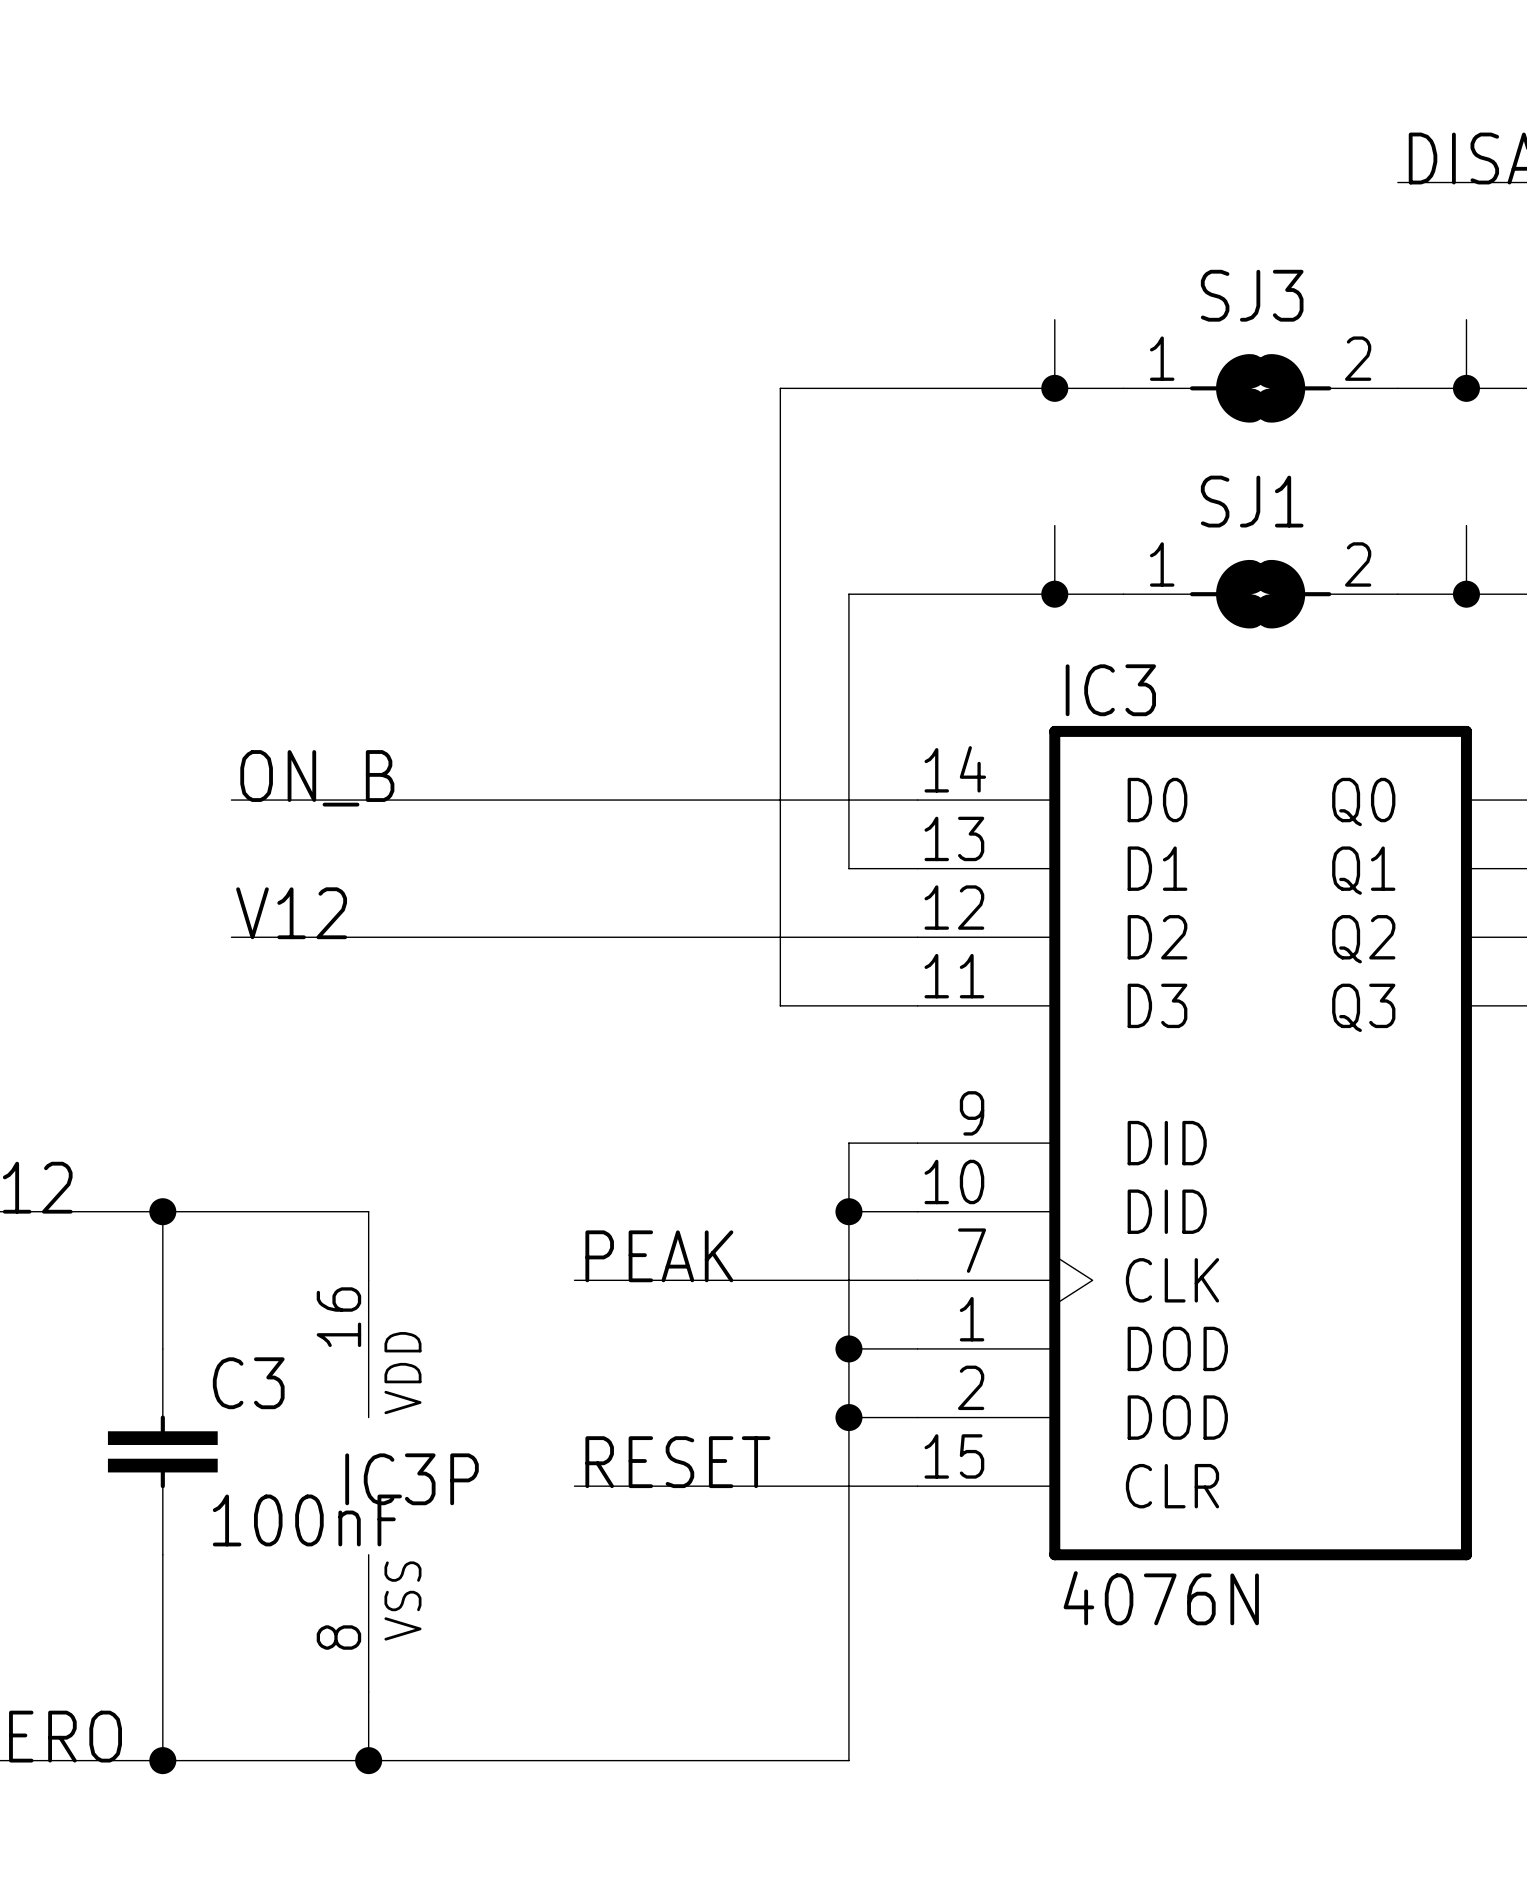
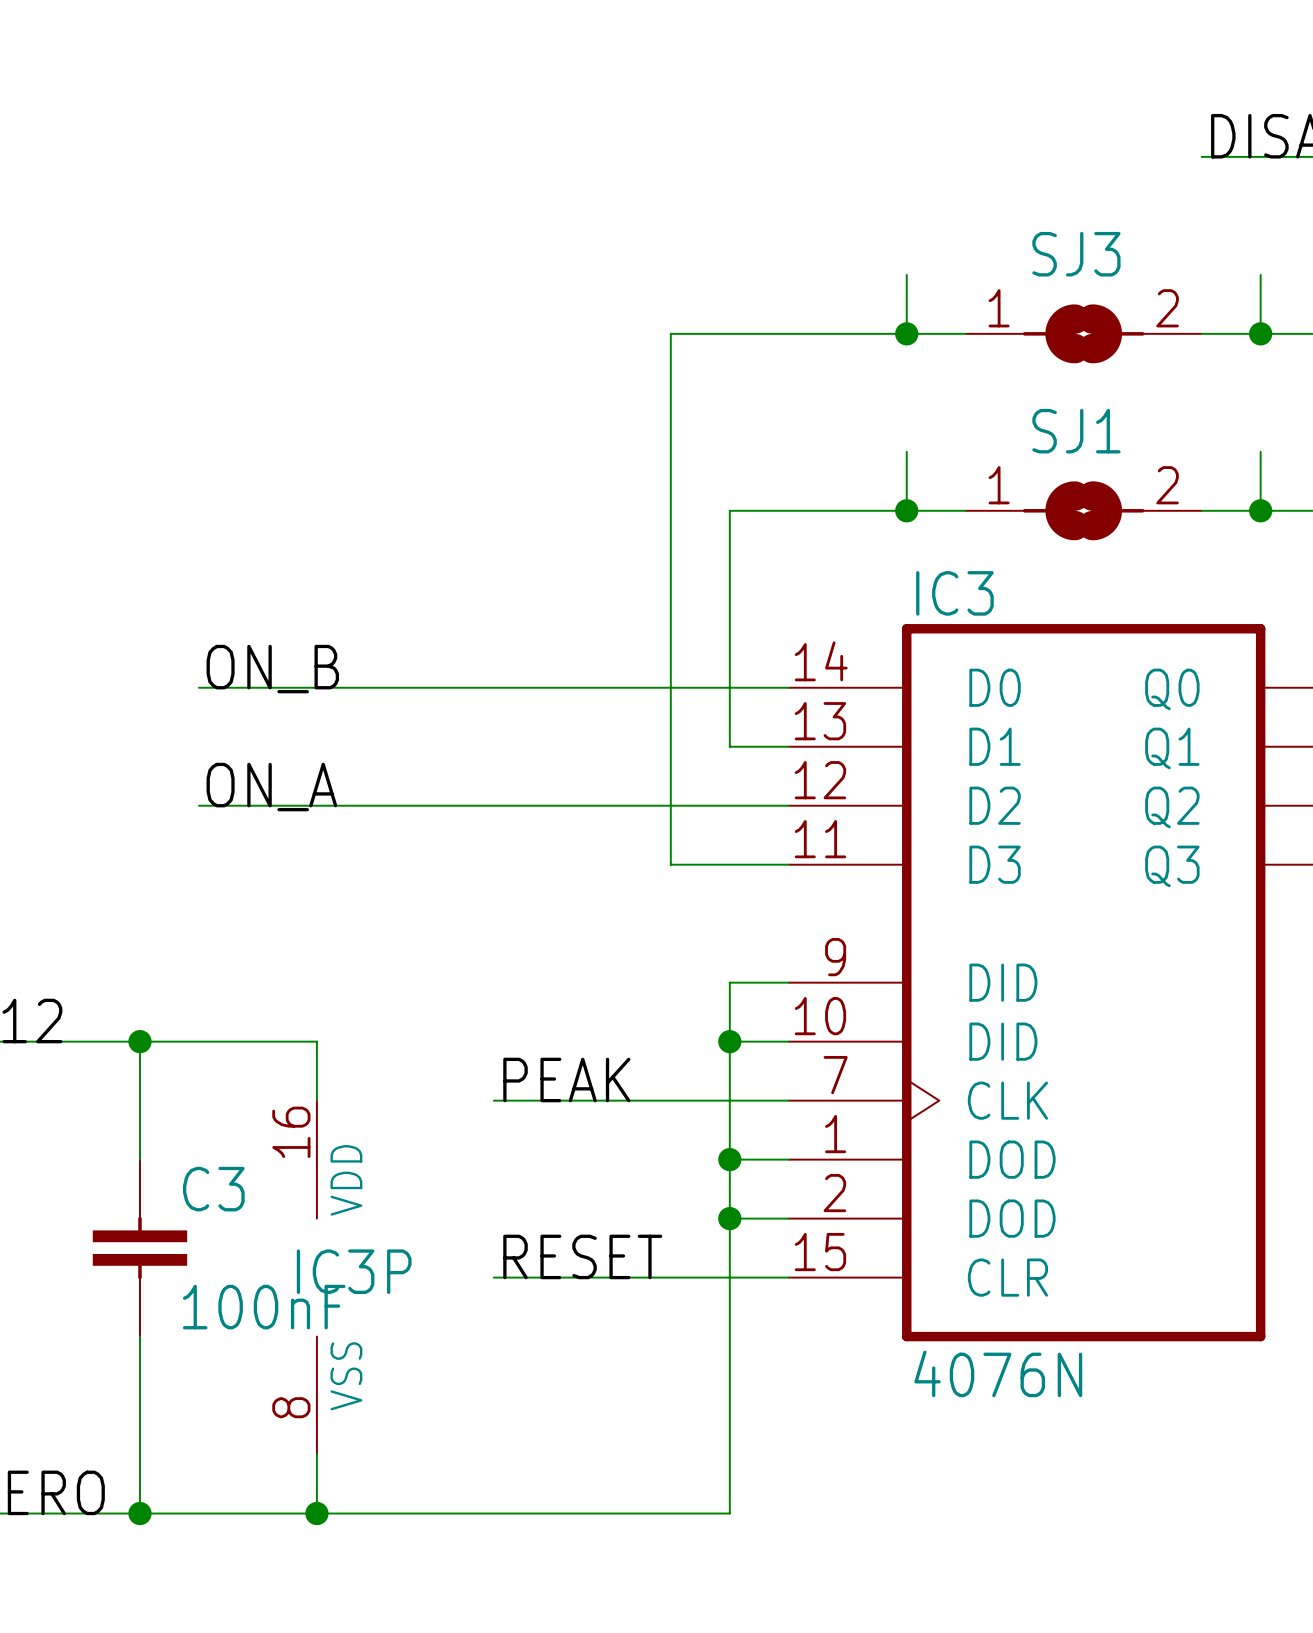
label: V12 (291, 913) -> ON_A (271, 787)

